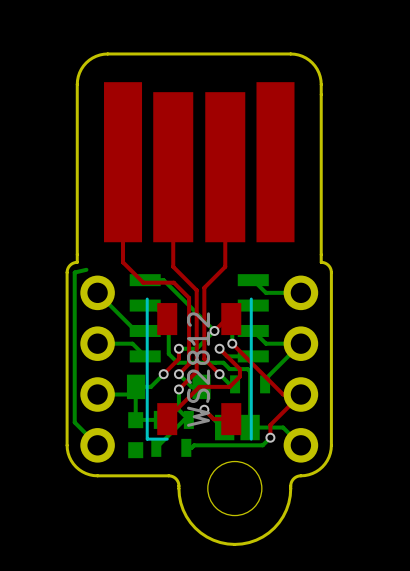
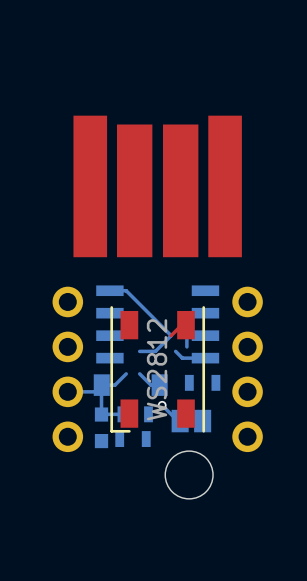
board edge: (107, 53) (294, 54) (309, 60) (317, 69) (320, 76) (321, 262) (328, 265) (331, 272) (331, 449) (327, 460) (319, 469) (292, 479) (286, 509) (274, 528) (262, 536) (249, 542) (227, 543) (213, 540) (200, 532) (186, 516) (180, 503) (178, 482) (172, 476) (89, 474) (76, 466) (68, 453) (67, 272) (70, 265) (77, 262) (77, 80) (81, 69) (89, 60) (96, 56) (107, 53) -> none
top track: (123, 162) (123, 262) (143, 282) (173, 282) (189, 297) (189, 364) (178, 374) -> none
top track: (173, 167) (173, 266) (196, 290) (196, 371) (178, 389) -> none
top track: (225, 167) (225, 266) (204, 287) (204, 358) (219, 374) -> none
bottom track: (86, 269) (74, 272) (74, 422) (97, 445) -> none
bottom track: (253, 280) (265, 292) (300, 292) -> none
bottom track: (97, 292) (135, 330) (145, 330) -> none
bottom track: (145, 305) (153, 305) (168, 320) (168, 353) (177, 362) (223, 362) (229, 369) (247, 369) (250, 371) (250, 427) (283, 427) (300, 445) -> none
via: (214, 330) -> none
bottom track: (253, 330) (265, 343) (300, 343) (265, 379) -> none
bottom track: (97, 343) (132, 343) (145, 356) -> none
top track: (232, 343) (283, 394) (300, 394) (270, 425) (270, 437) -> none
via: (232, 343) -> none
top track: (178, 348) (178, 358) (163, 374) -> none
via: (178, 348) -> none
top track: (219, 348) (239, 369) (239, 376) (229, 386) (199, 386) (167, 419) -> none
via: (219, 348) -> none
via: (163, 374) -> none
via: (178, 374) -> none
bottom track: (219, 374) (229, 384) (235, 384) -> none
via: (219, 374) -> none
bottom track: (178, 389) (178, 409) (188, 419) (184, 419) (156, 447) -> none
via: (178, 389) -> none
top track: (204, 409) (213, 419) (231, 419) -> none
bottom track: (270, 437) (262, 445) (194, 445) (191, 447) (186, 447) -> none
via: (270, 437) -> none

